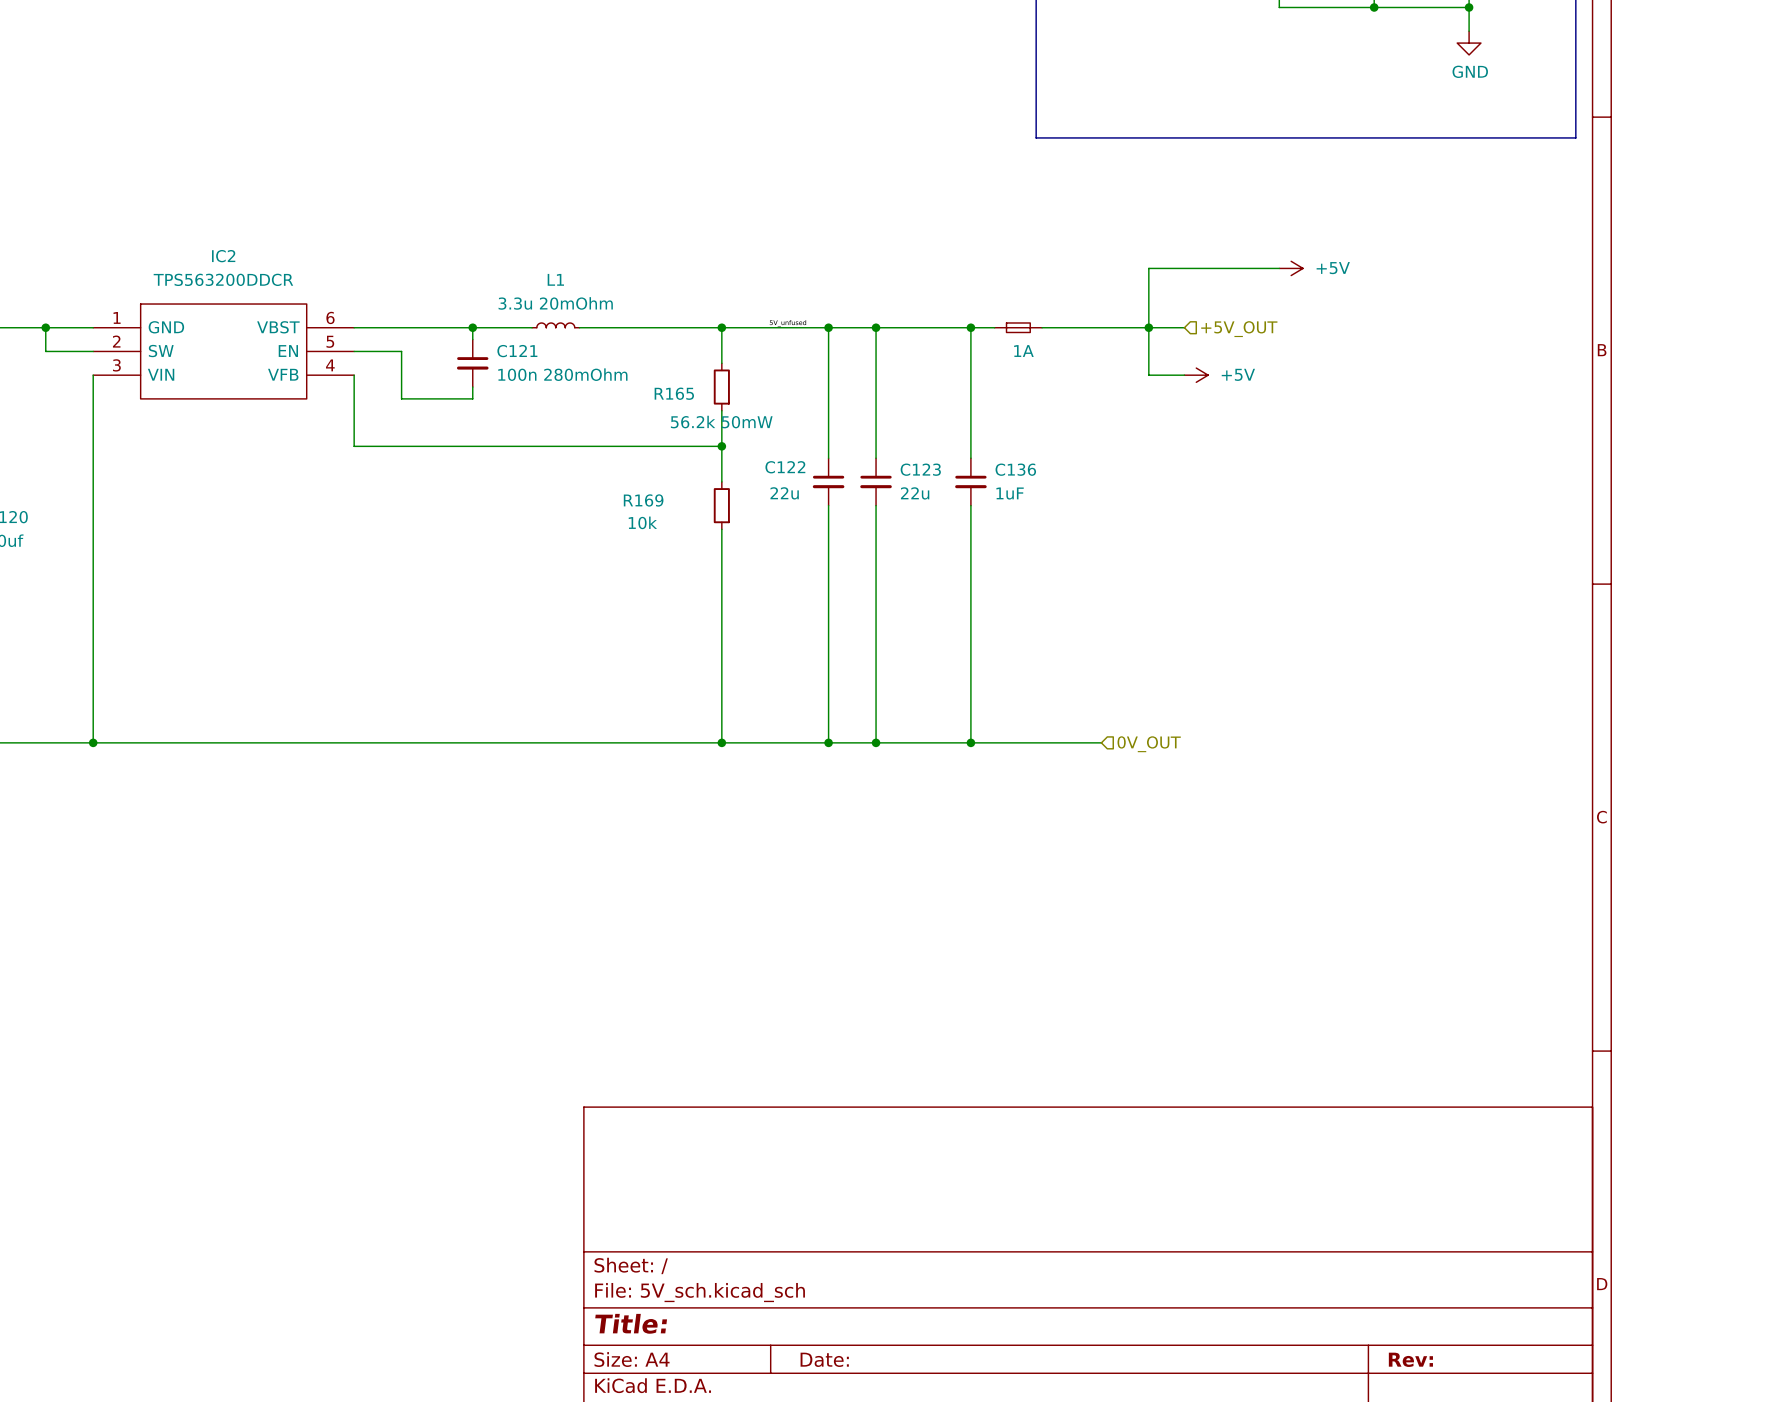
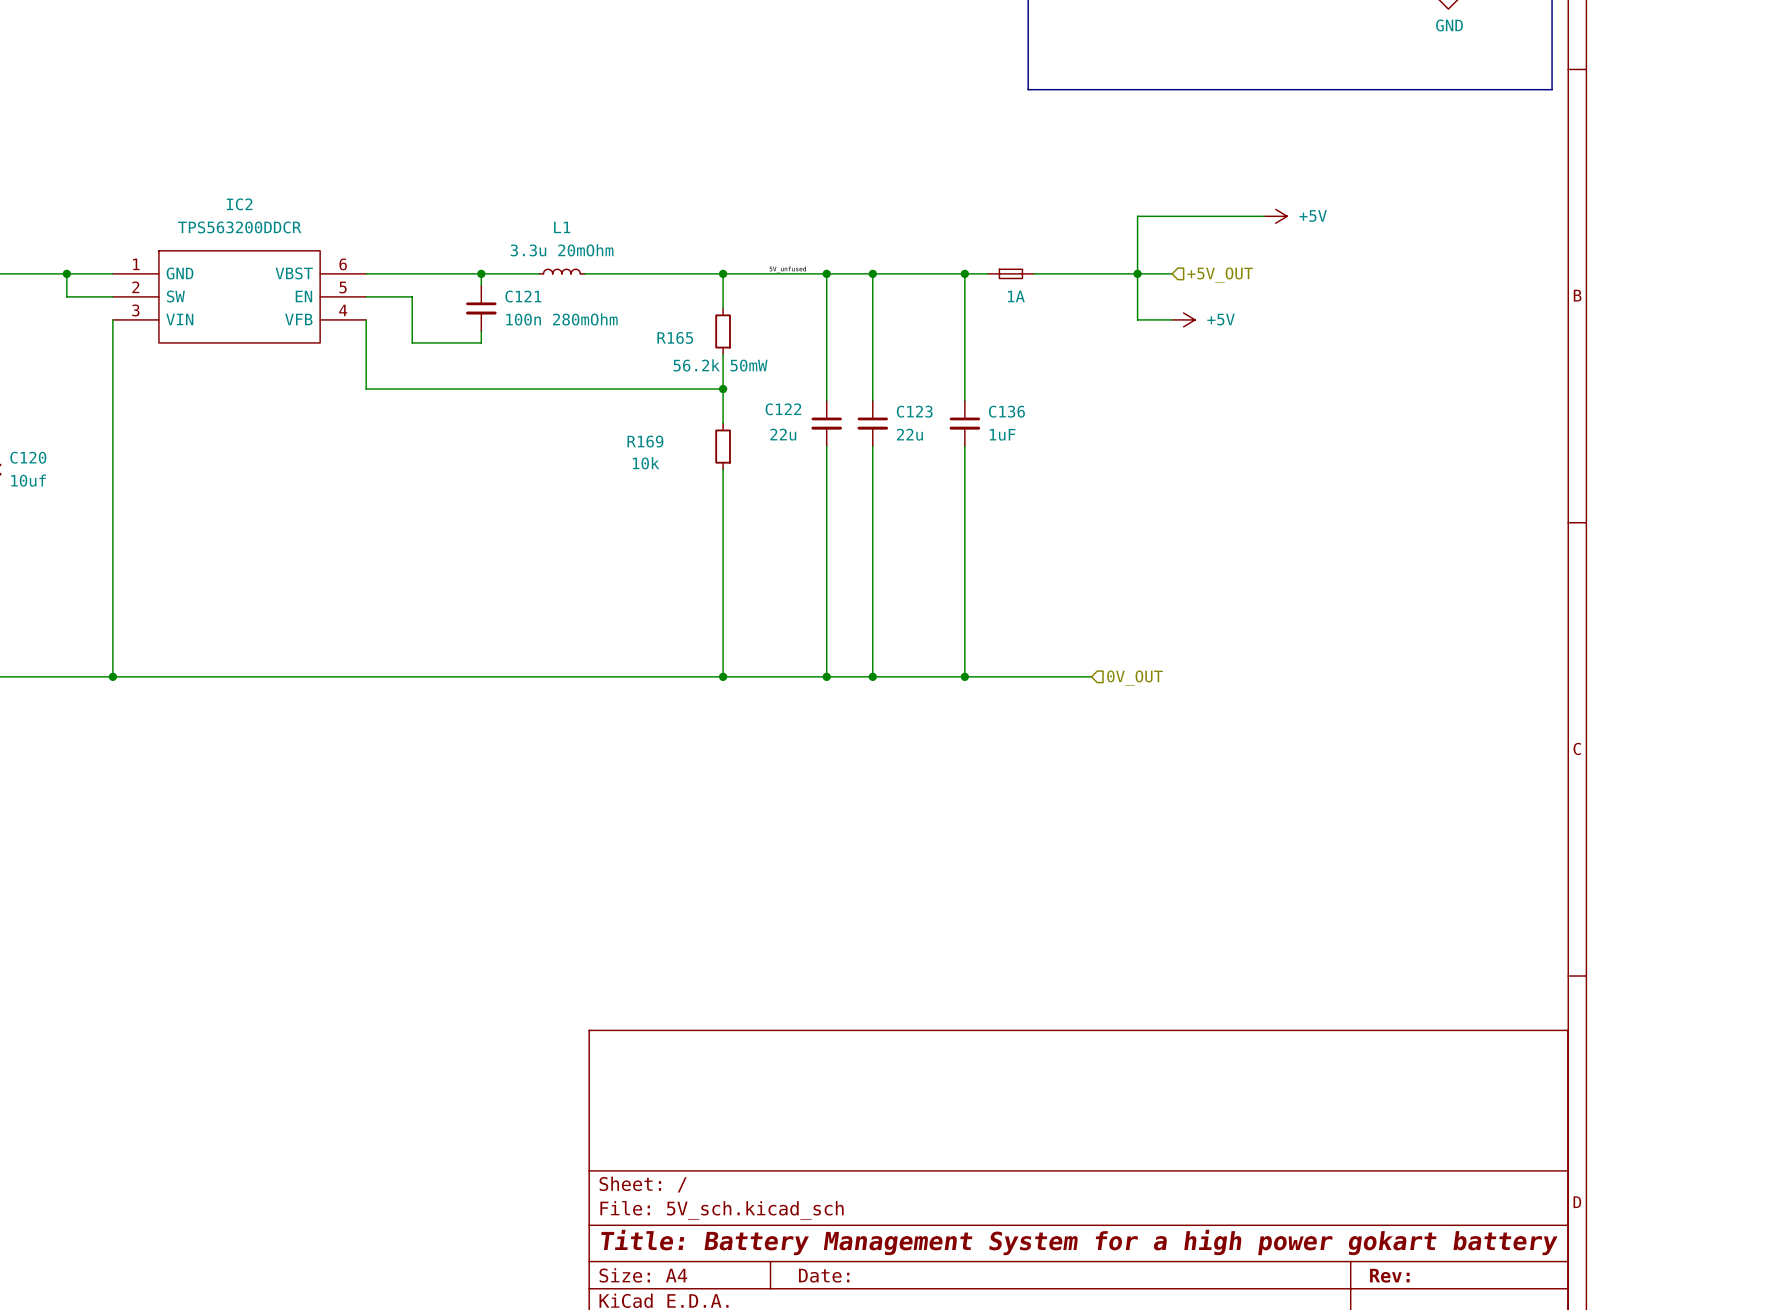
title block: Title: (631, 1323) -> Title: Battery Management System for a high power gokart battery (1079, 1242)

